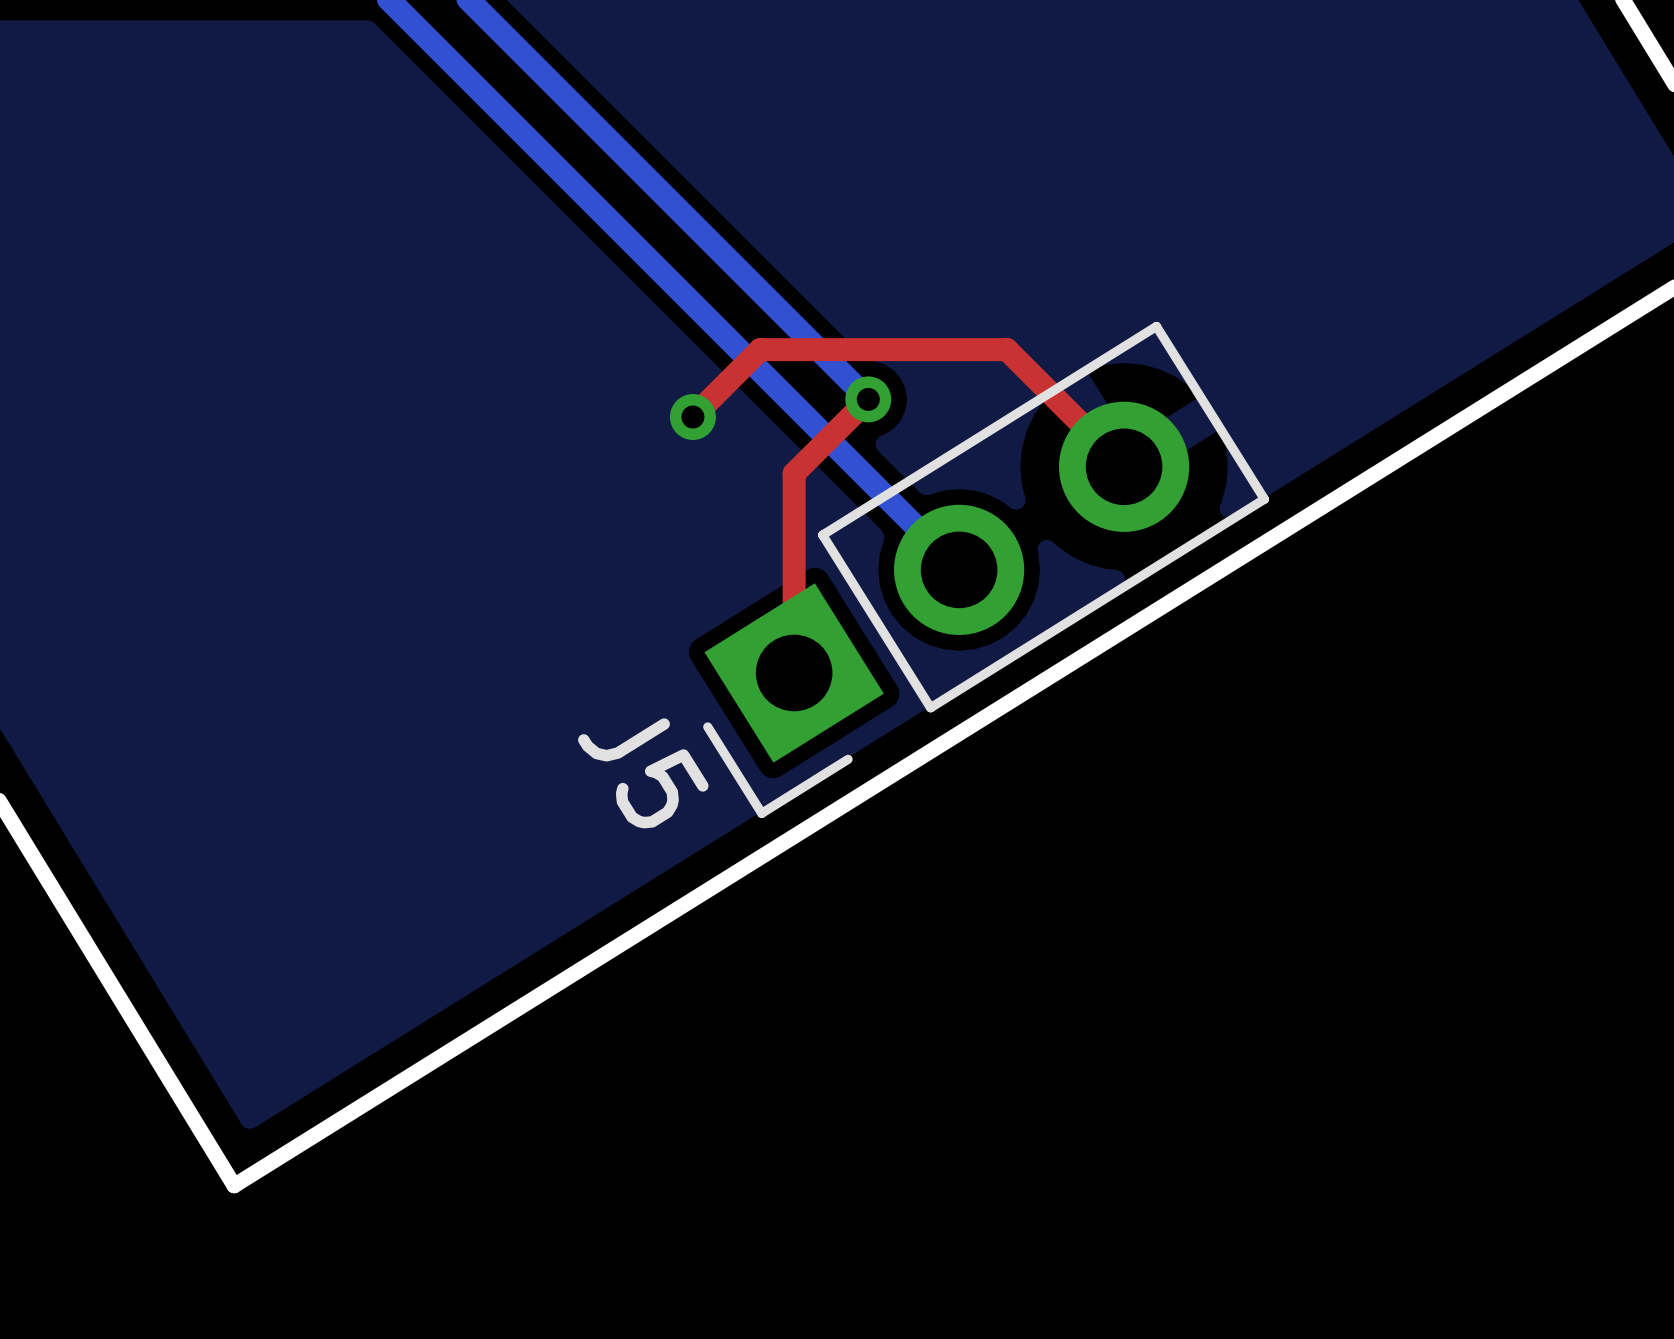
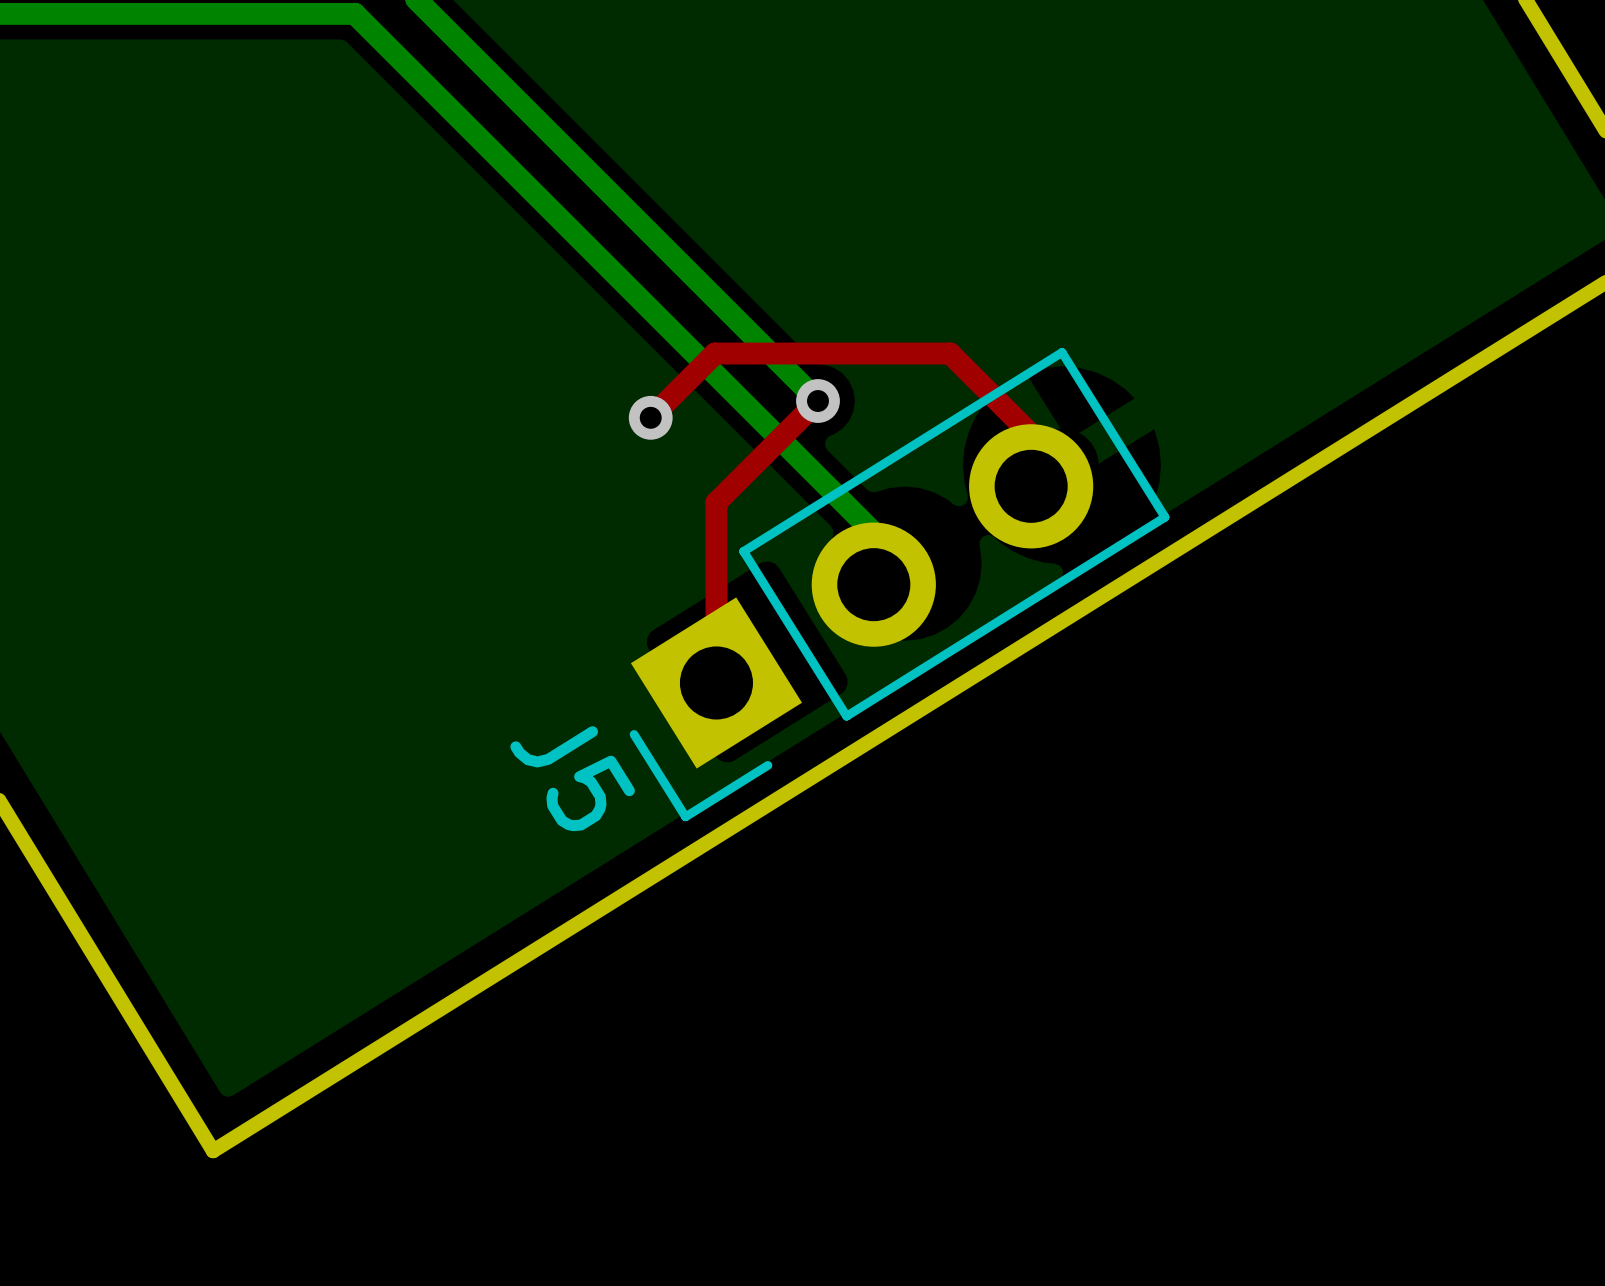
top track: (794, 473) (794, 672) -> (747, 471) (716, 502) (716, 682)
J5 position: (986, 569) -> (899, 584)

